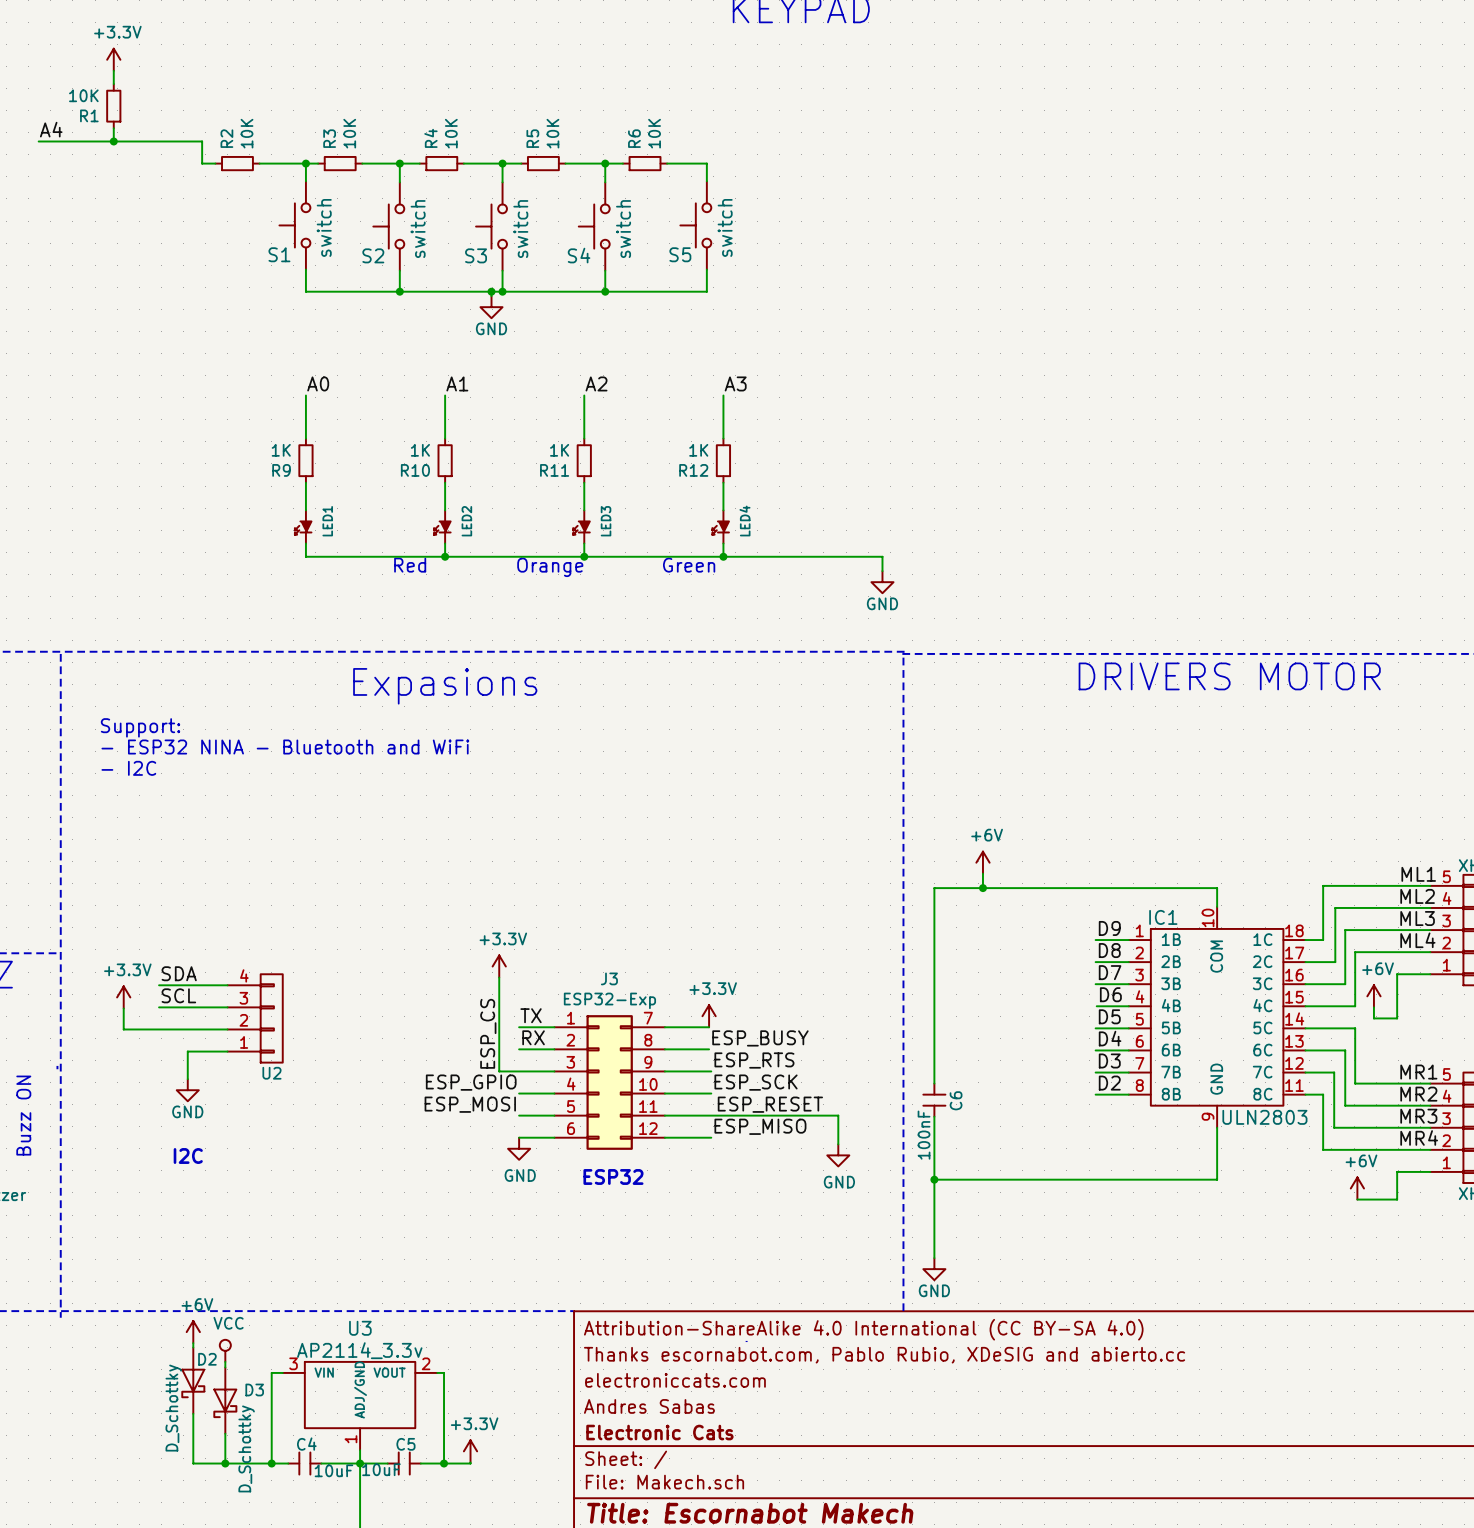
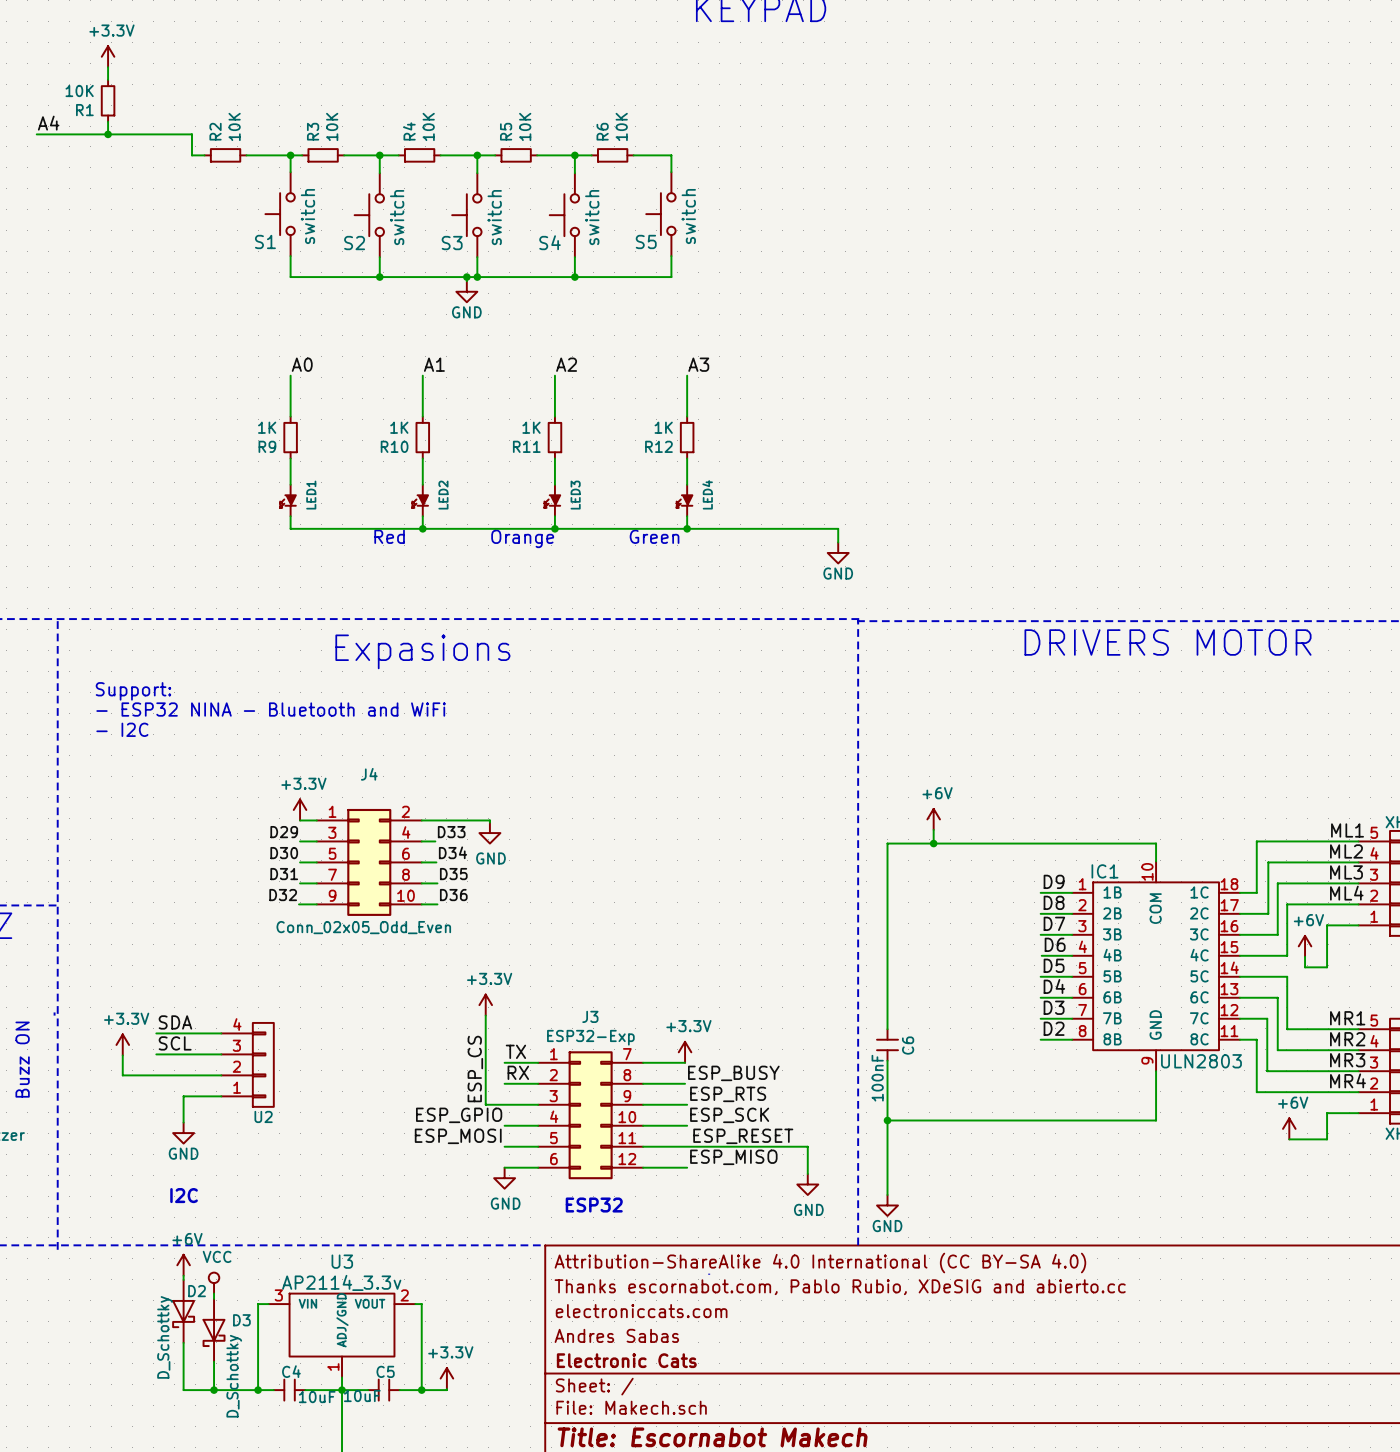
power symbol: none -> +3.3V (300, 809)
wire: none -> (300, 820) (316, 820)
wire: none -> (421, 820) (489, 820) (489, 822)
label: none -> D29 (284, 832)
label: none -> D33 (451, 832)
power symbol: none -> GND (489, 833)
wire: none -> (300, 841) (316, 841)
wire: none -> (421, 841) (435, 841)
label: none -> D34 (452, 852)
label: none -> D30 (284, 853)
wire: none -> (300, 862) (316, 862)
J4: none -> Conn_02x05_Odd_Even (369, 862)
wire: none -> (421, 862) (436, 862)
label: none -> D31 (284, 874)
label: none -> D35 (453, 874)
wire: none -> (300, 883) (316, 883)
wire: none -> (421, 883) (437, 883)
label: none -> D32 (283, 895)
label: none -> D36 (453, 895)
wire: none -> (299, 904) (316, 904)
wire: none -> (421, 904) (437, 904)
power symbol position: +3.3V (499, 966) -> +3.3V (485, 1005)
label position: SDA (179, 973) -> SDA (175, 1022)
wire: (499, 977) (499, 1071) (554, 1071) -> (485, 1015) (485, 1104) (538, 1104)
wire: (159, 985) (227, 985) -> (156, 1033) (221, 1033)
label position: SCL (178, 995) -> SCL (175, 1043)
power symbol position: +3.3V (123, 997) -> +3.3V (122, 1044)
wire: (159, 1007) (227, 1007) -> (156, 1054) (221, 1054)
wire: (123, 1008) (123, 1029) (227, 1029) -> (122, 1055) (122, 1075) (221, 1075)
label position: TX (531, 1015) -> TX (515, 1051)
power symbol position: +3.3V (709, 1016) -> +3.3V (685, 1052)
U2 position: (255, 1018) -> (247, 1064)
wire: (519, 1027) (554, 1027) -> (504, 1062) (538, 1062)
wire: (664, 1027) (709, 1027) -> (643, 1062) (685, 1062)
label position: ESP_CS (488, 1033) -> ESP_CS (475, 1069)
label position: RX (533, 1037) -> RX (518, 1072)
label position: ESP_BUSY (760, 1038) -> ESP_BUSY (733, 1073)
wire: (519, 1049) (554, 1049) -> (504, 1083) (538, 1083)
wire: (664, 1049) (709, 1049) -> (643, 1083) (685, 1083)
wire: (227, 1051) (187, 1051) (187, 1079) -> (221, 1096) (183, 1096) (183, 1122)
label position: ESP_RTS (754, 1060) -> ESP_RTS (728, 1094)
wire: (664, 1071) (711, 1071) -> (643, 1104) (687, 1104)
label position: ESP_GPIO (471, 1082) -> ESP_GPIO (459, 1115)
J3 position: (609, 1082) -> (590, 1115)
label position: ESP_SCK (756, 1082) -> ESP_SCK (729, 1115)
power symbol position: GND (187, 1090) -> GND (183, 1133)
wire: (519, 1093) (554, 1093) -> (504, 1125) (538, 1125)
wire: (664, 1093) (711, 1093) -> (643, 1125) (687, 1125)
label position: ESP_MOSI (470, 1104) -> ESP_MOSI (458, 1136)
label position: ESP_RESET (770, 1104) -> ESP_RESET (743, 1136)
wire: (519, 1115) (554, 1115) -> (504, 1146) (538, 1146)
wire: (664, 1115) (838, 1115) (838, 1144) -> (643, 1146) (807, 1146) (807, 1174)
label position: ESP_MISO (760, 1126) -> ESP_MISO (733, 1157)
wire: (519, 1137) (554, 1137) -> (504, 1167) (538, 1167)
wire: (664, 1137) (711, 1137) -> (643, 1167) (687, 1167)
power symbol position: GND (519, 1148) -> GND (504, 1178)
power symbol position: GND (838, 1155) -> GND (807, 1184)
text position: I2C (188, 1156) -> I2C (184, 1195)
text position: ESP32 (613, 1176) -> ESP32 (594, 1205)

